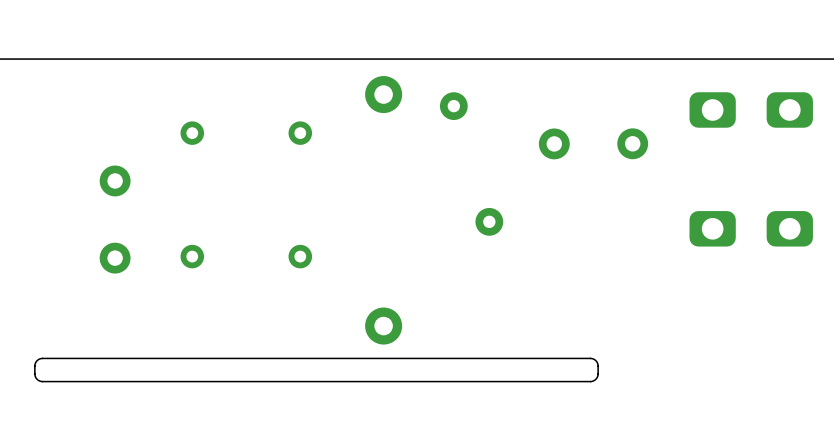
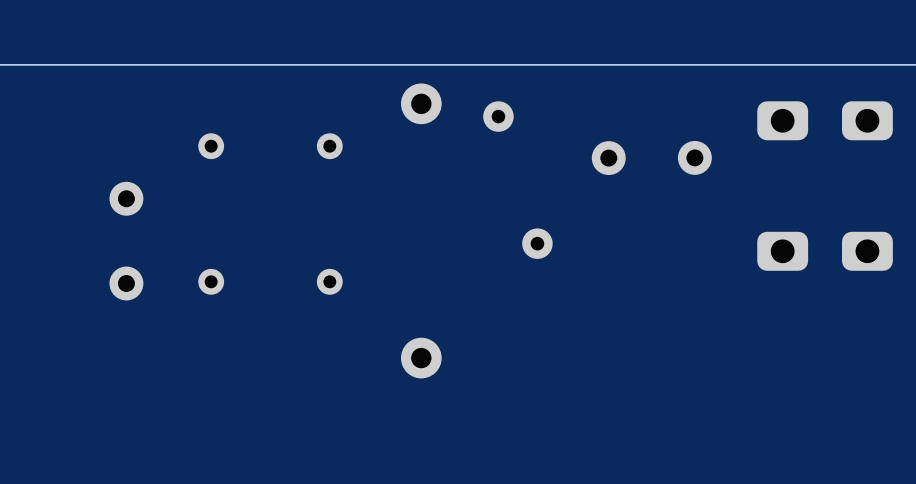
board edge: (42, 358) (590, 358) (597, 362) (598, 373) (595, 379) (590, 381) (42, 381) (37, 379) (34, 373) (35, 362) (42, 358) -> none

